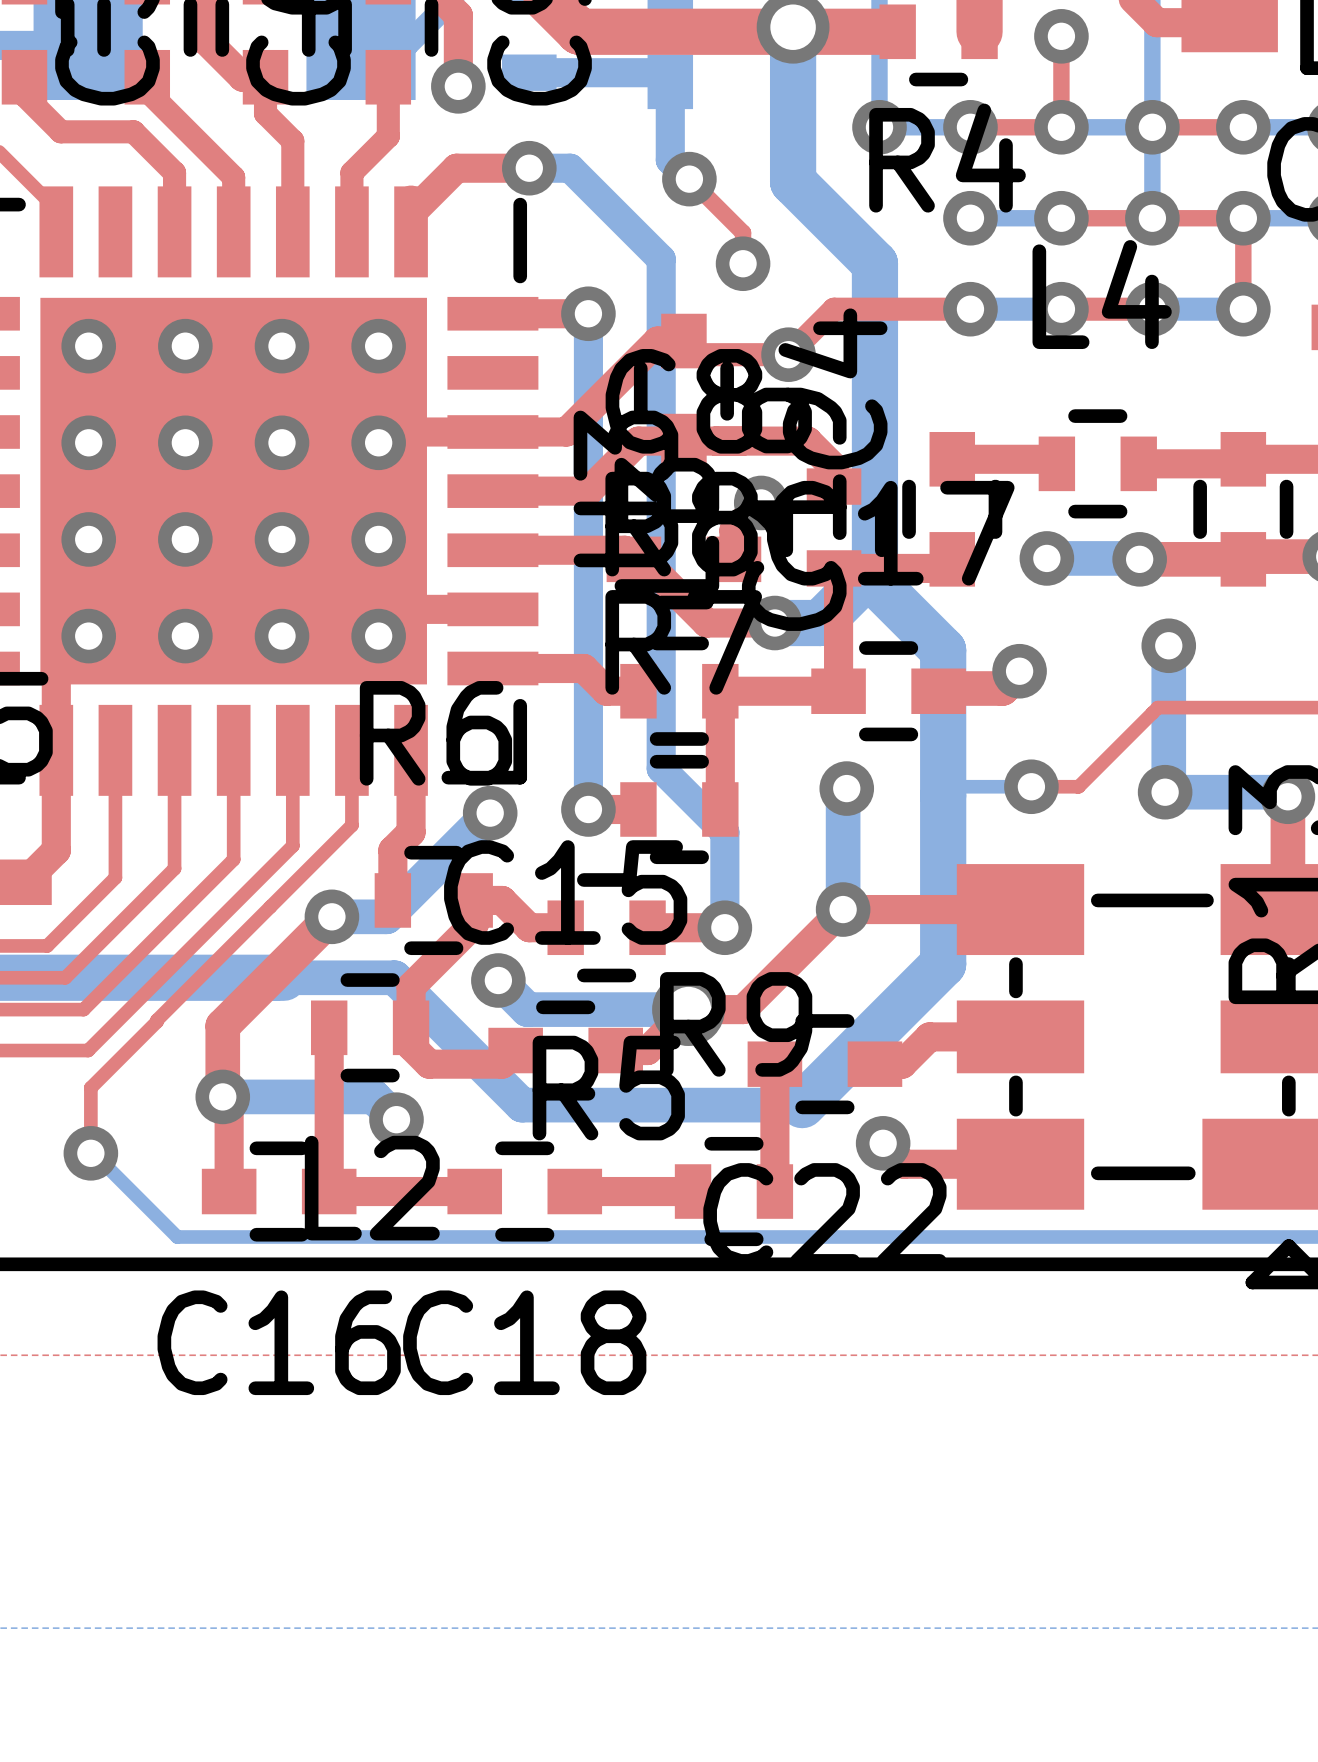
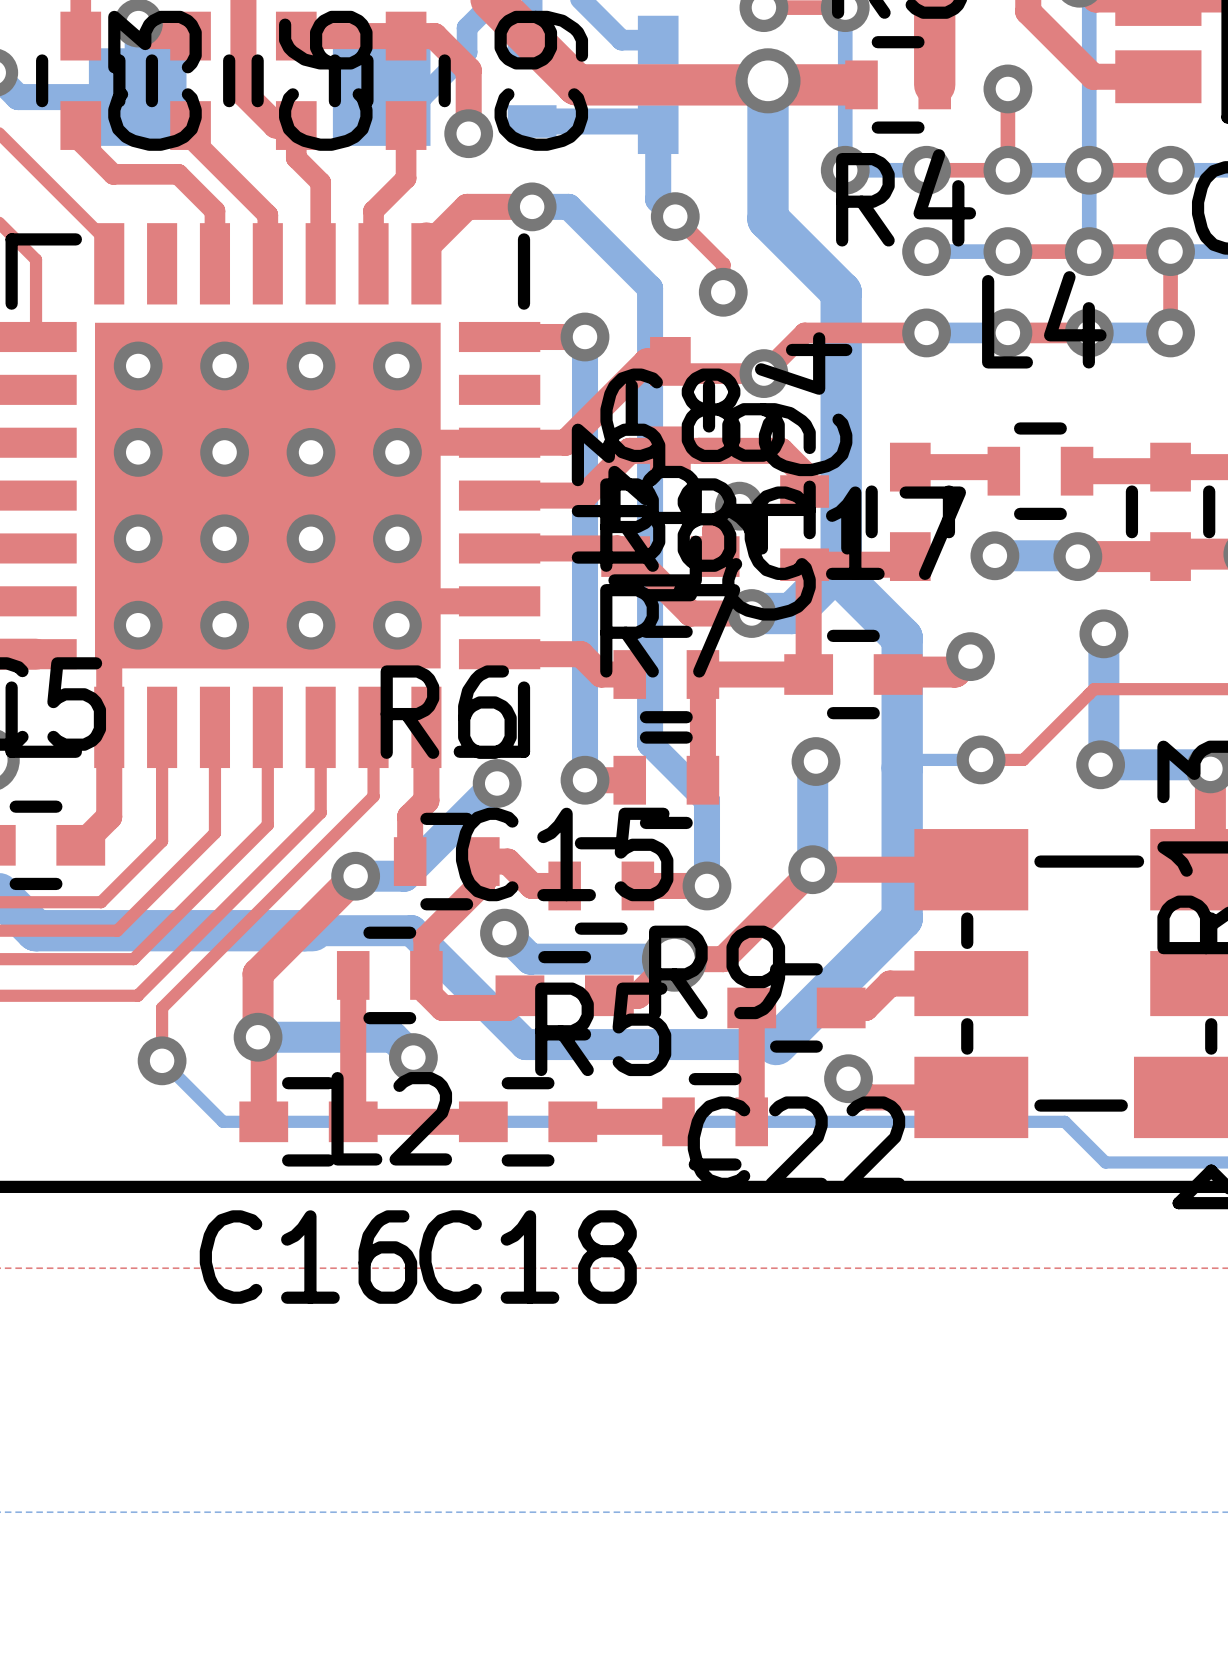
top track: (351, 825) (157, 1020) -> (373, 794) (162, 1007) (162, 1060)
top track: (157, 1021) (90, 1087) (90, 1153) -> none
bottom track: (89, 1148) (177, 1237) (1170, 1237) -> (162, 1060) (223, 1121) (1064, 1121) (1105, 1162)
via position: (90, 1153) -> (162, 1060)

